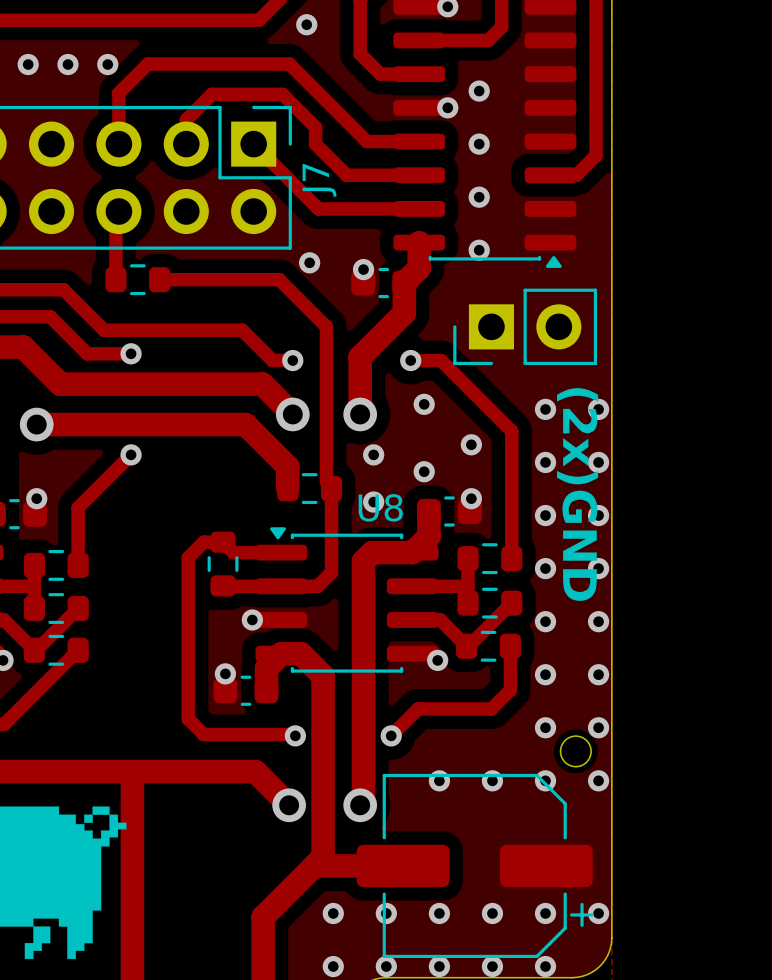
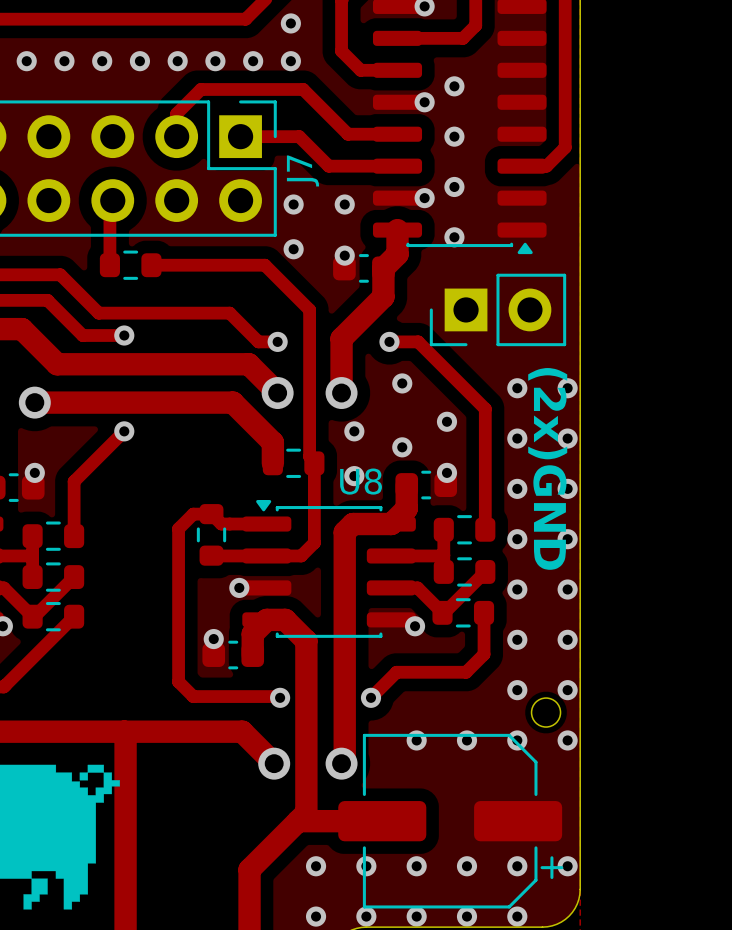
via: none -> (139, 61)
via: none -> (177, 61)
via: none -> (215, 61)
via: none -> (253, 61)
via: none -> (290, 61)
track: (282, 94) (315, 127) (315, 144) -> (268, 89) (303, 89)
track: (319, 94) (289, 64) (147, 64) (118, 93) (118, 144) -> none
track: (253, 144) (318, 208) (419, 208) -> (240, 136) (299, 136)
via: none -> (424, 198)
via: none -> (293, 204)
via: none -> (344, 204)

